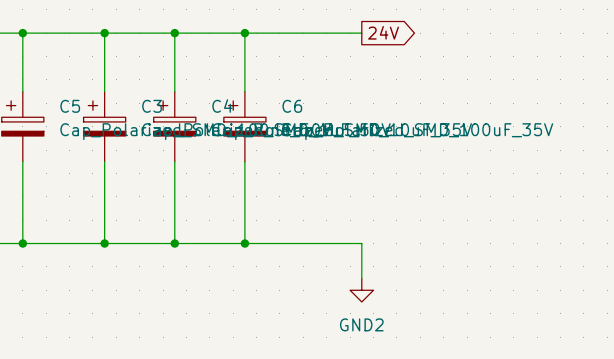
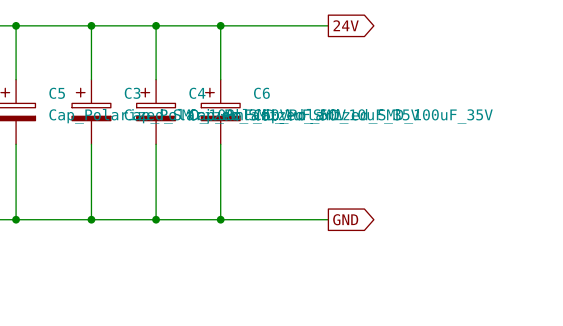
wire: (361, 243) (361, 278) -> none
global label: none -> GND (345, 219)
power symbol: GND2 (361, 290) -> none

